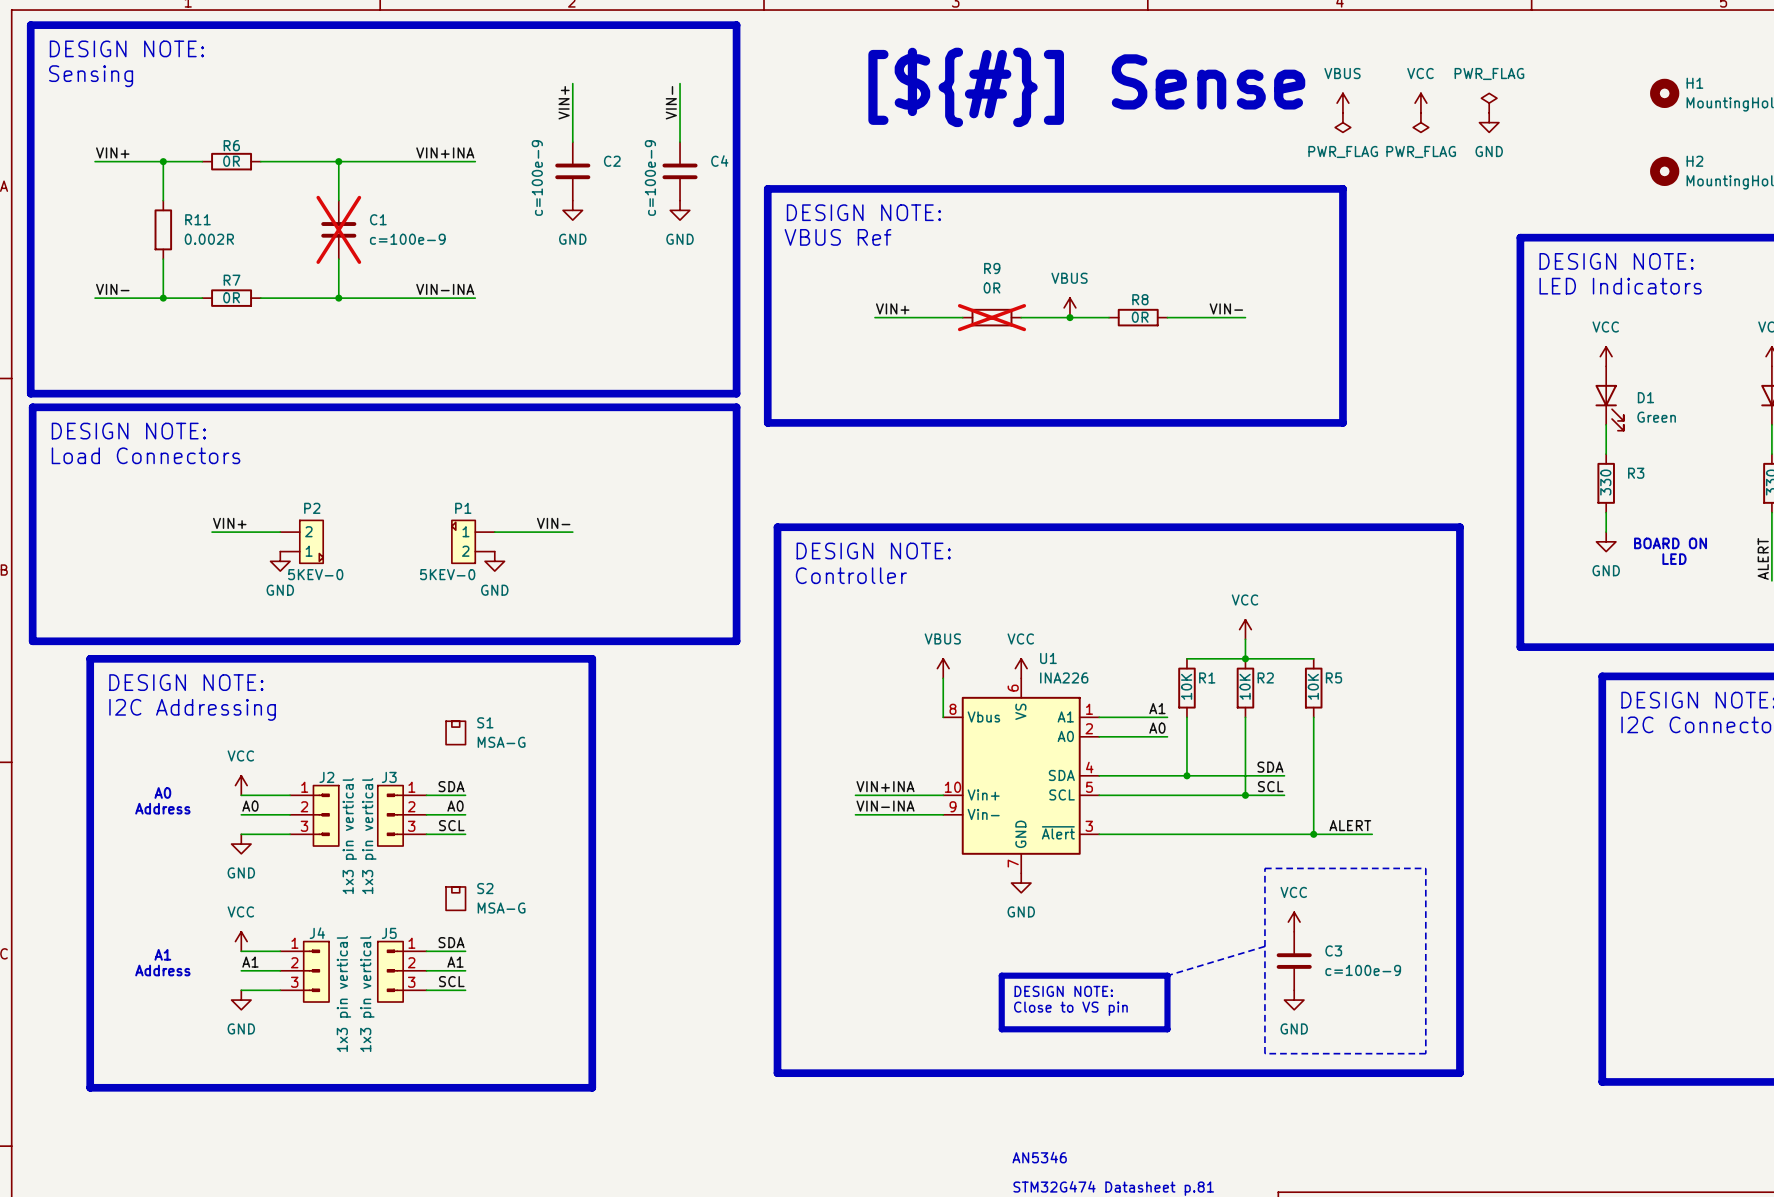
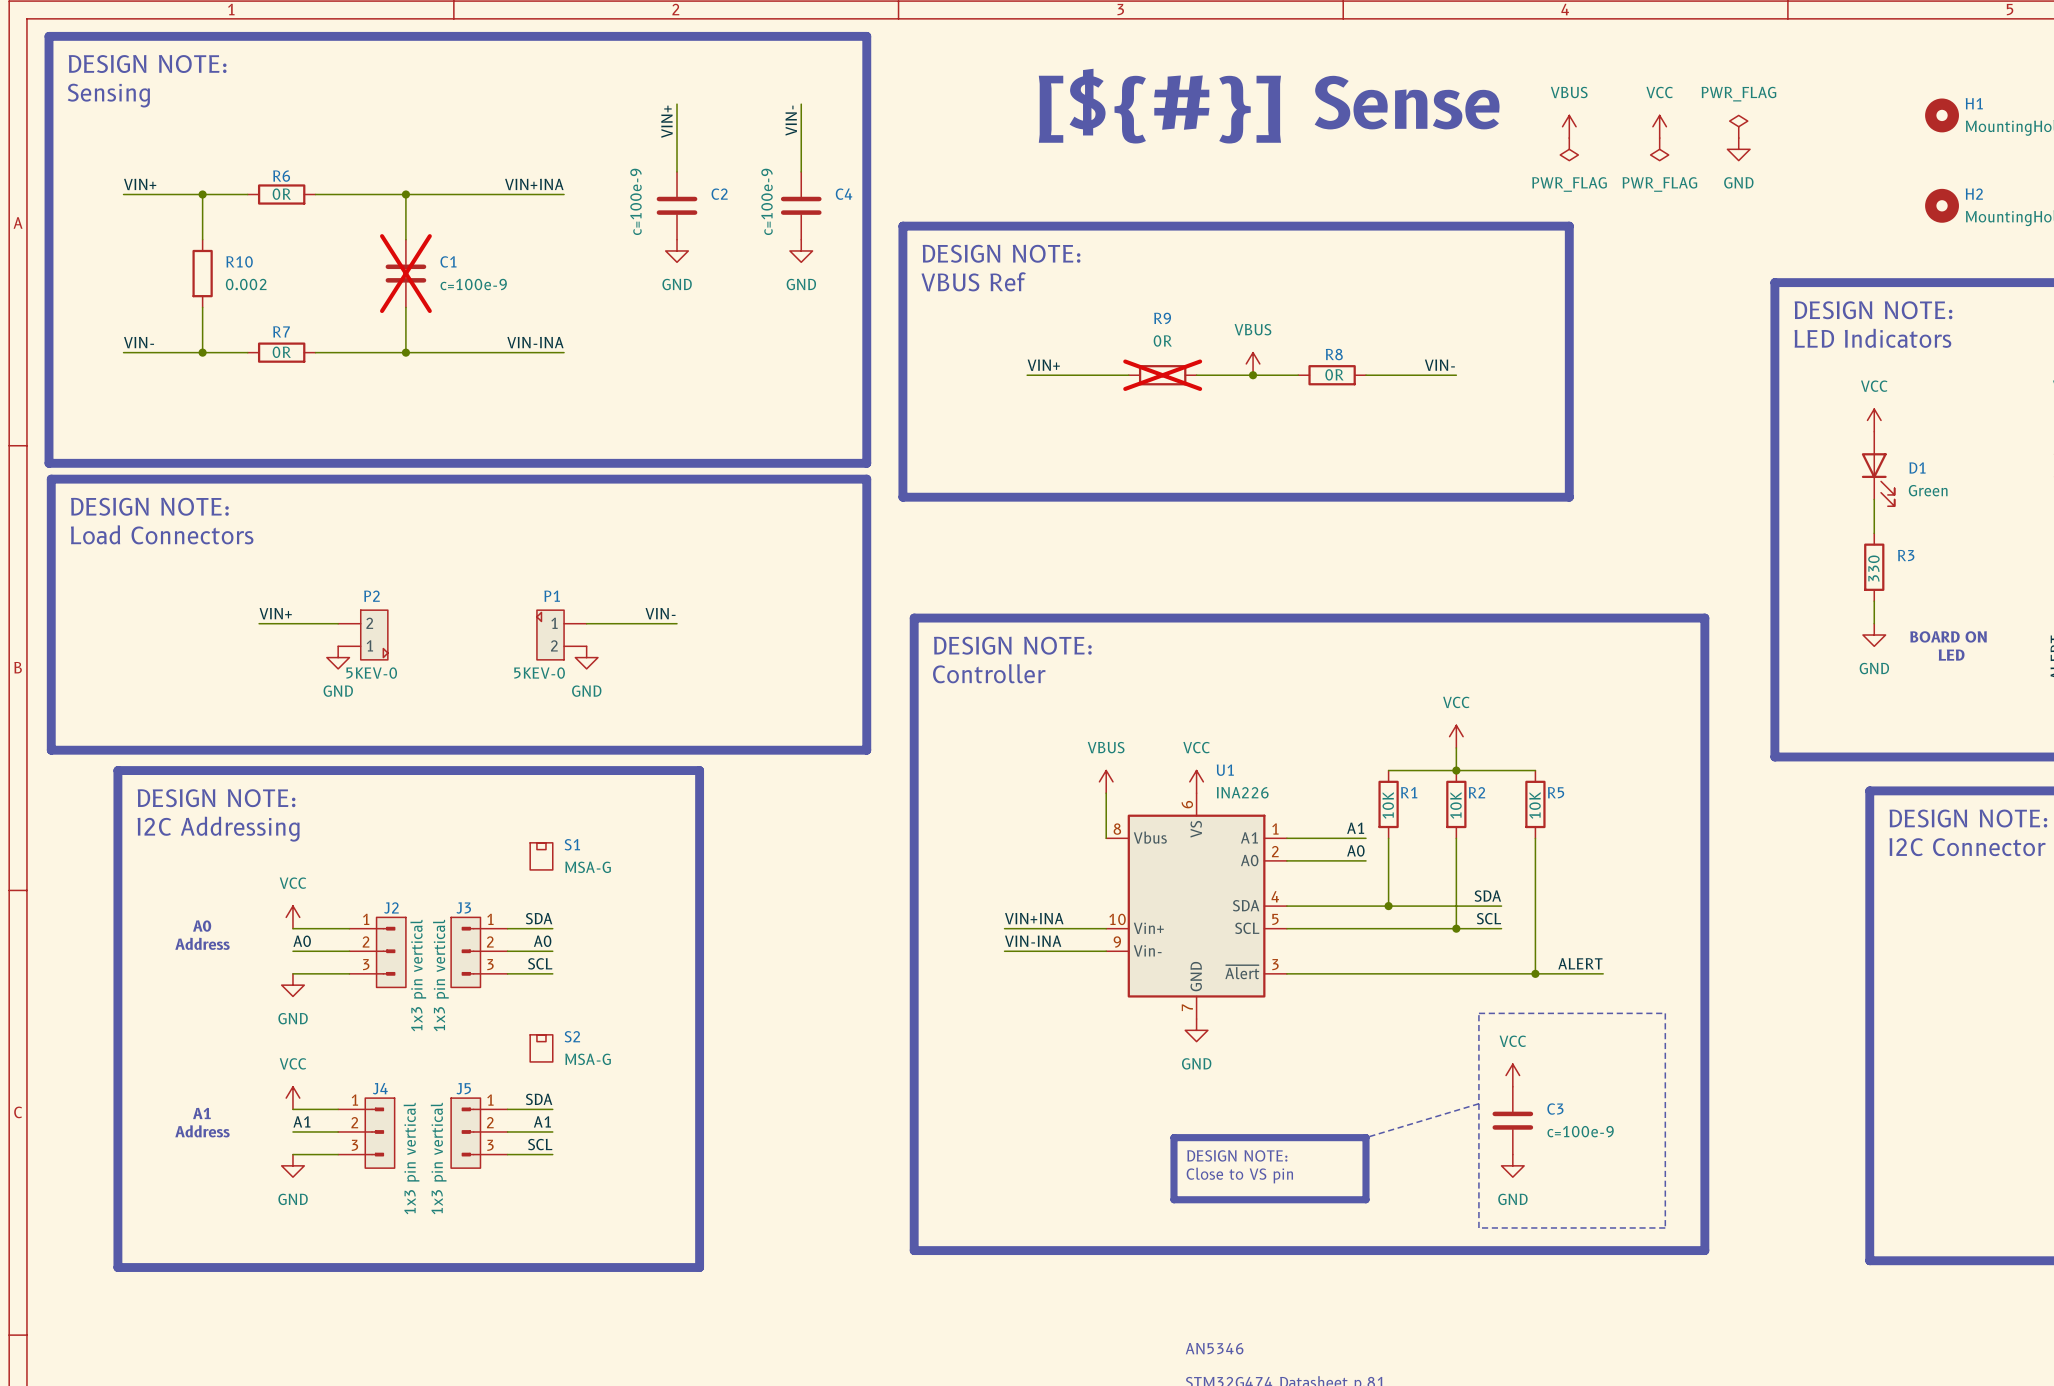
R11 name: R11 (197, 219) -> R10 (239, 261)
R11 value: 0.002R (209, 239) -> 0.002 (246, 284)

